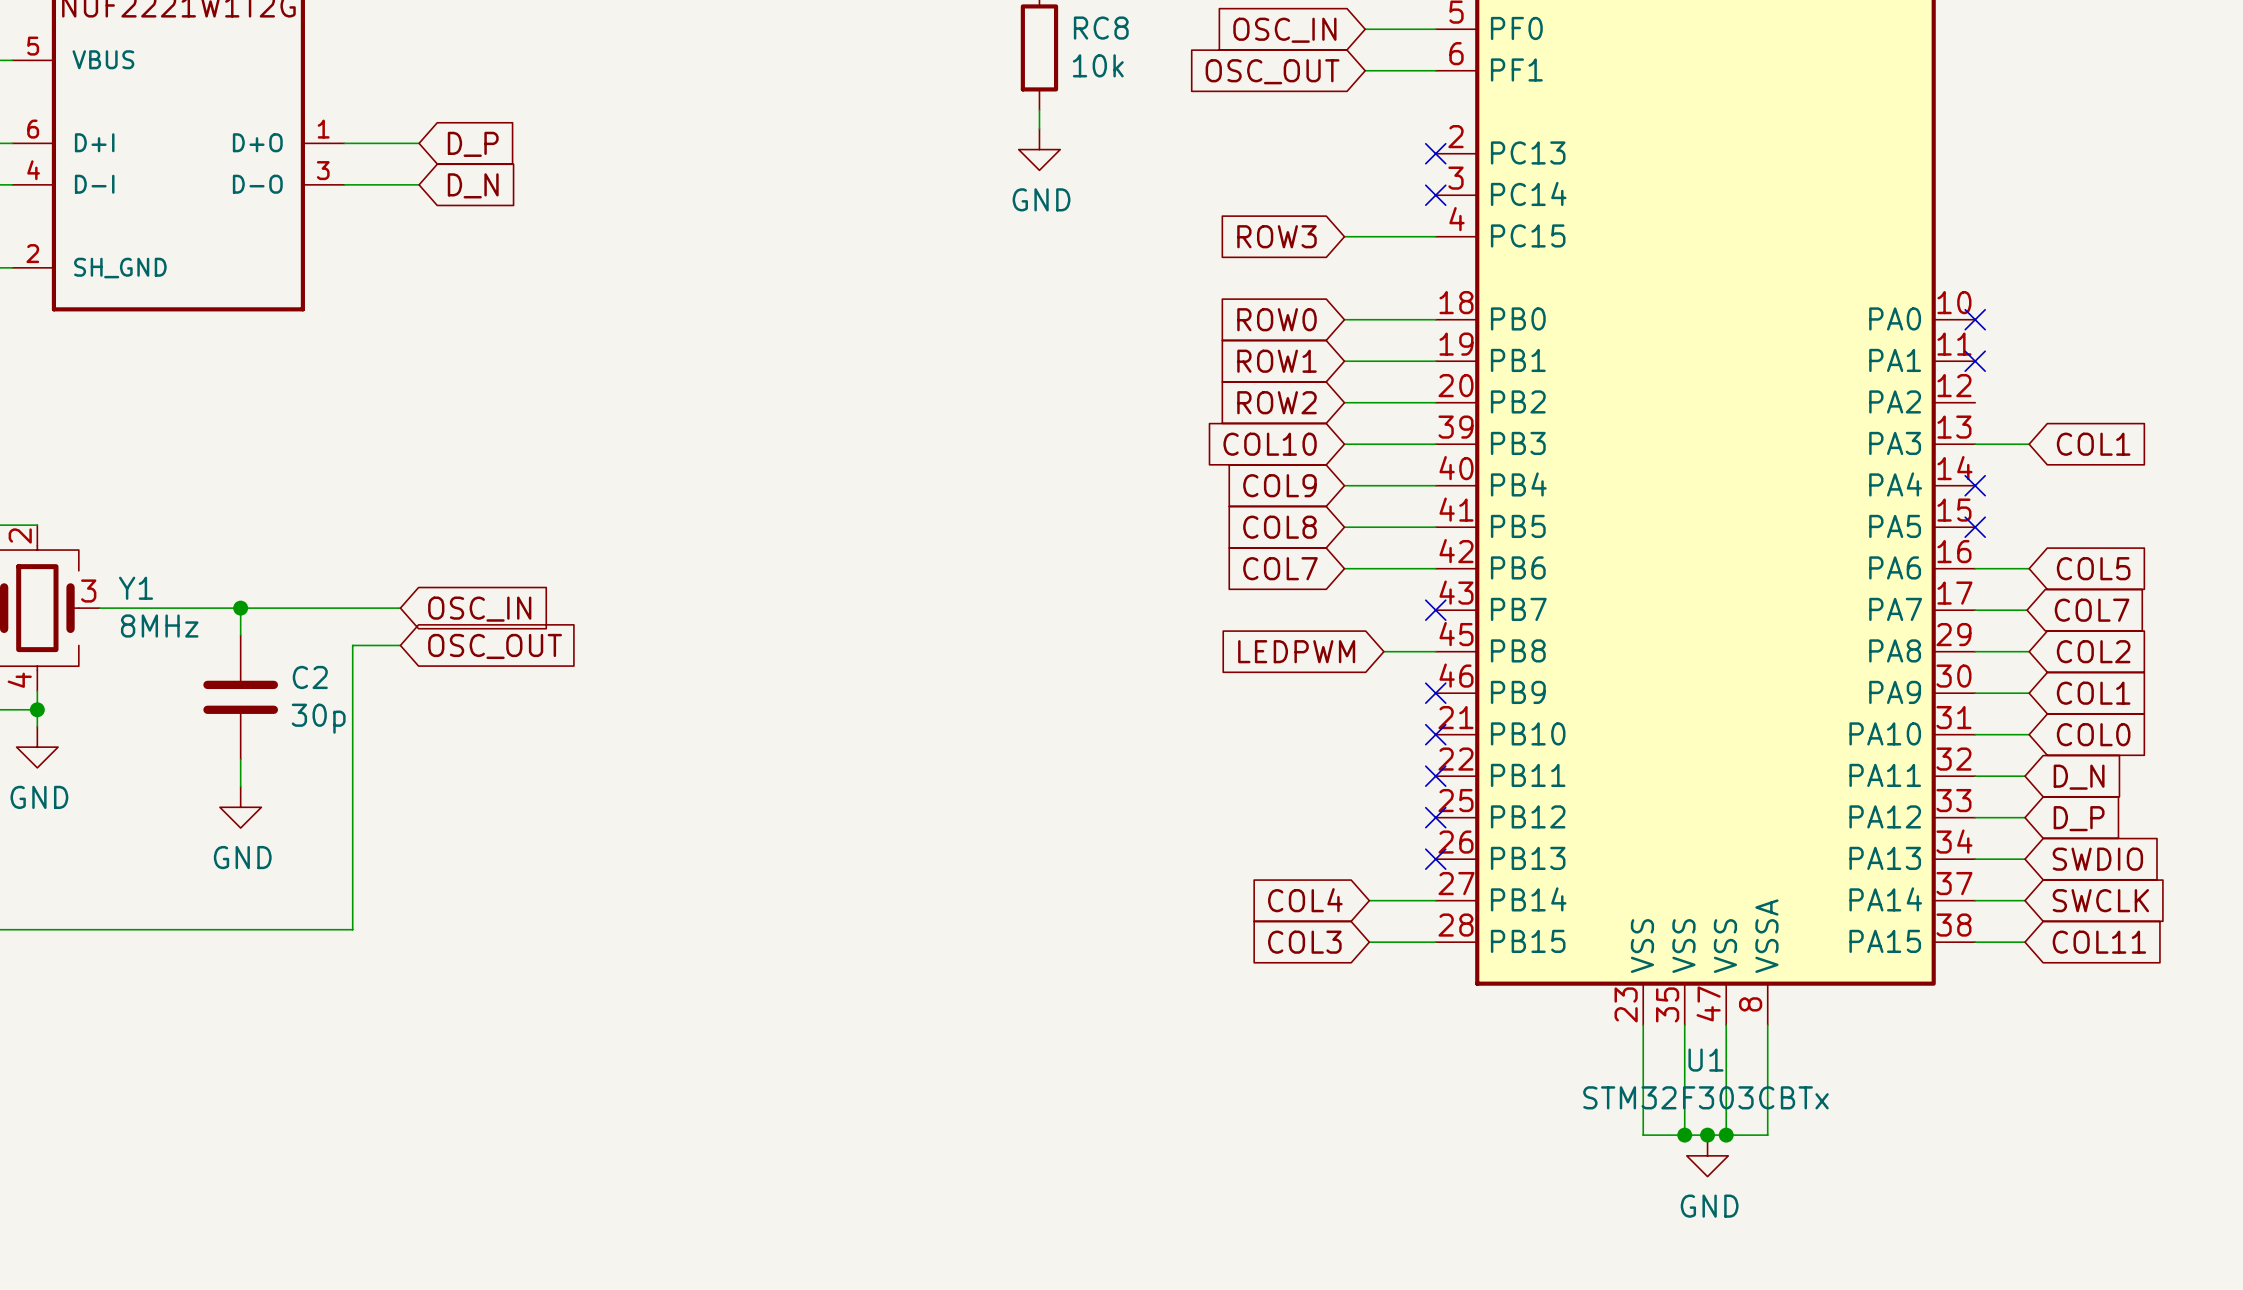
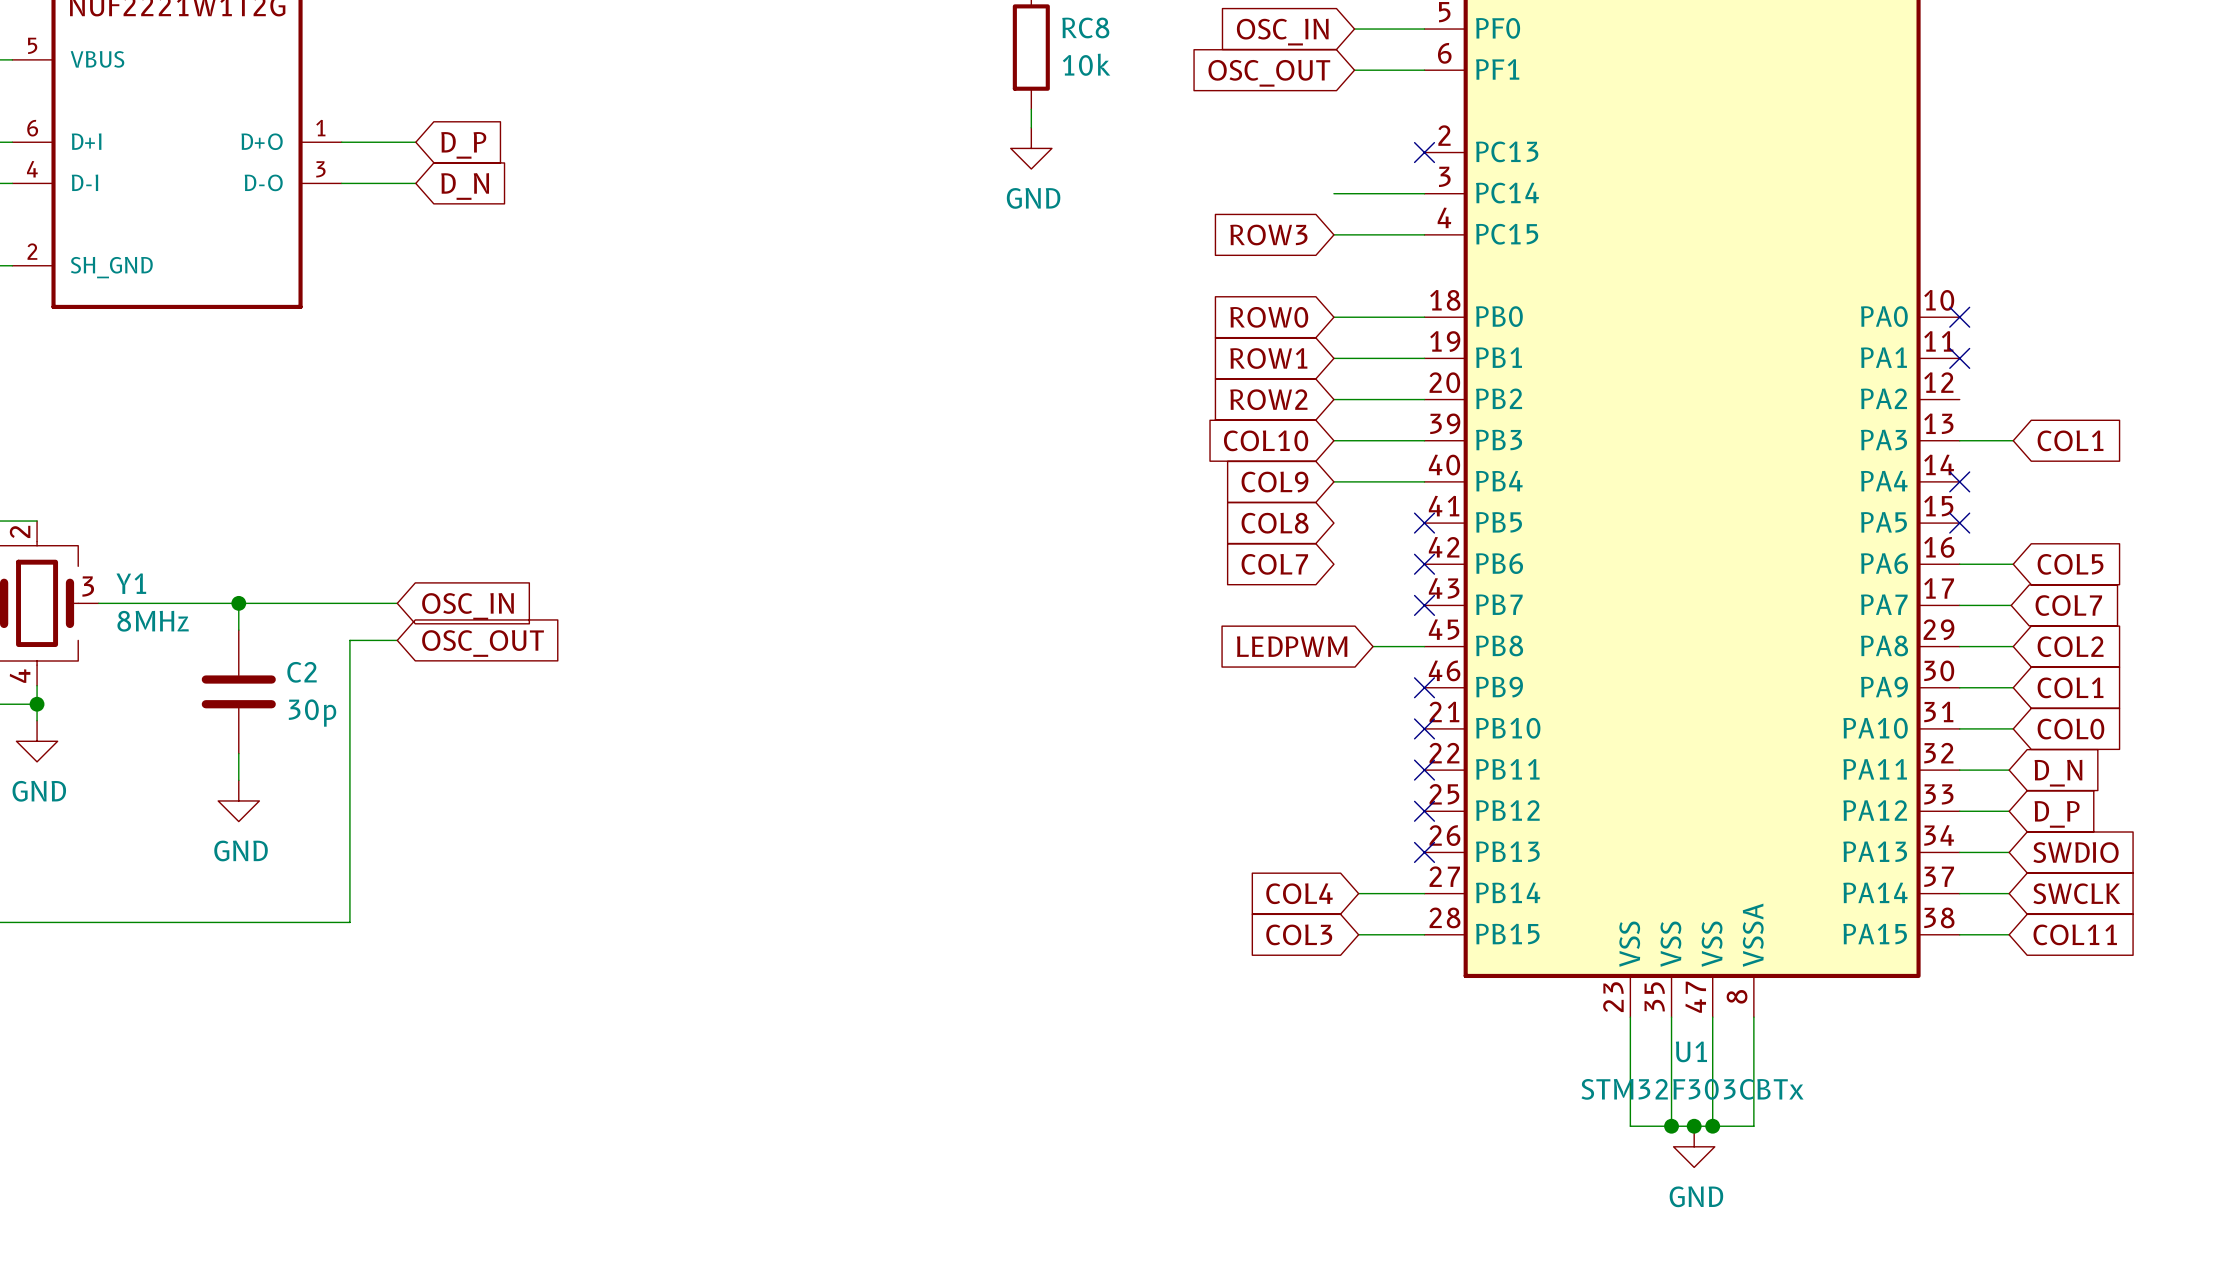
no-connect mark: (1435, 195) -> none
wire: (1344, 527) (1435, 527) -> (1333, 193) (1424, 193)
no-connect mark: none -> (1424, 523)
wire: (1344, 568) (1435, 568) -> none
no-connect mark: none -> (1424, 564)

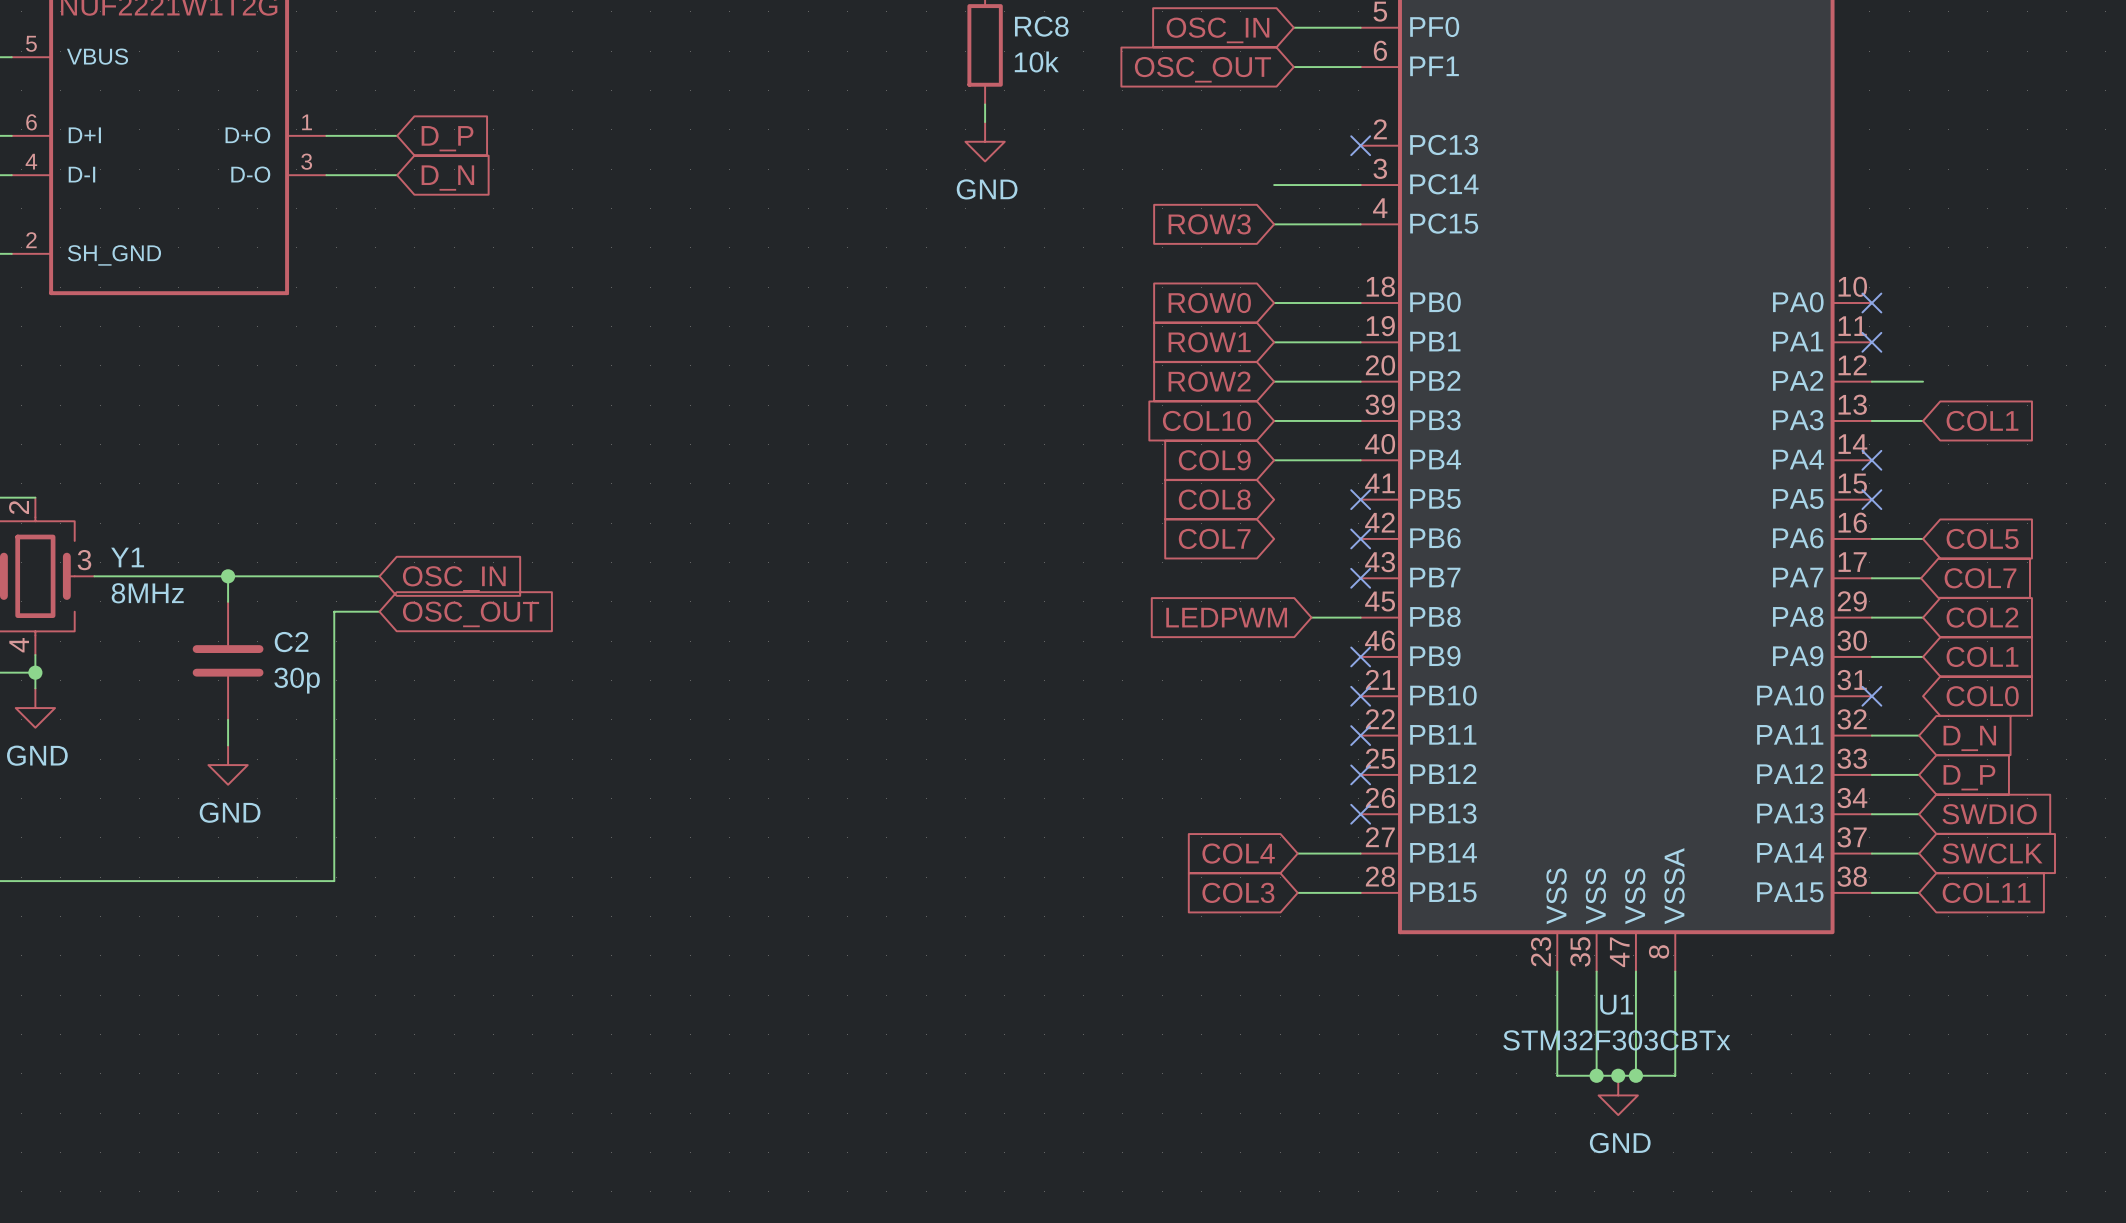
wire: (1959, 728) (2013, 728) -> (1871, 381) (1923, 381)
no-connect mark: none -> (1871, 696)

